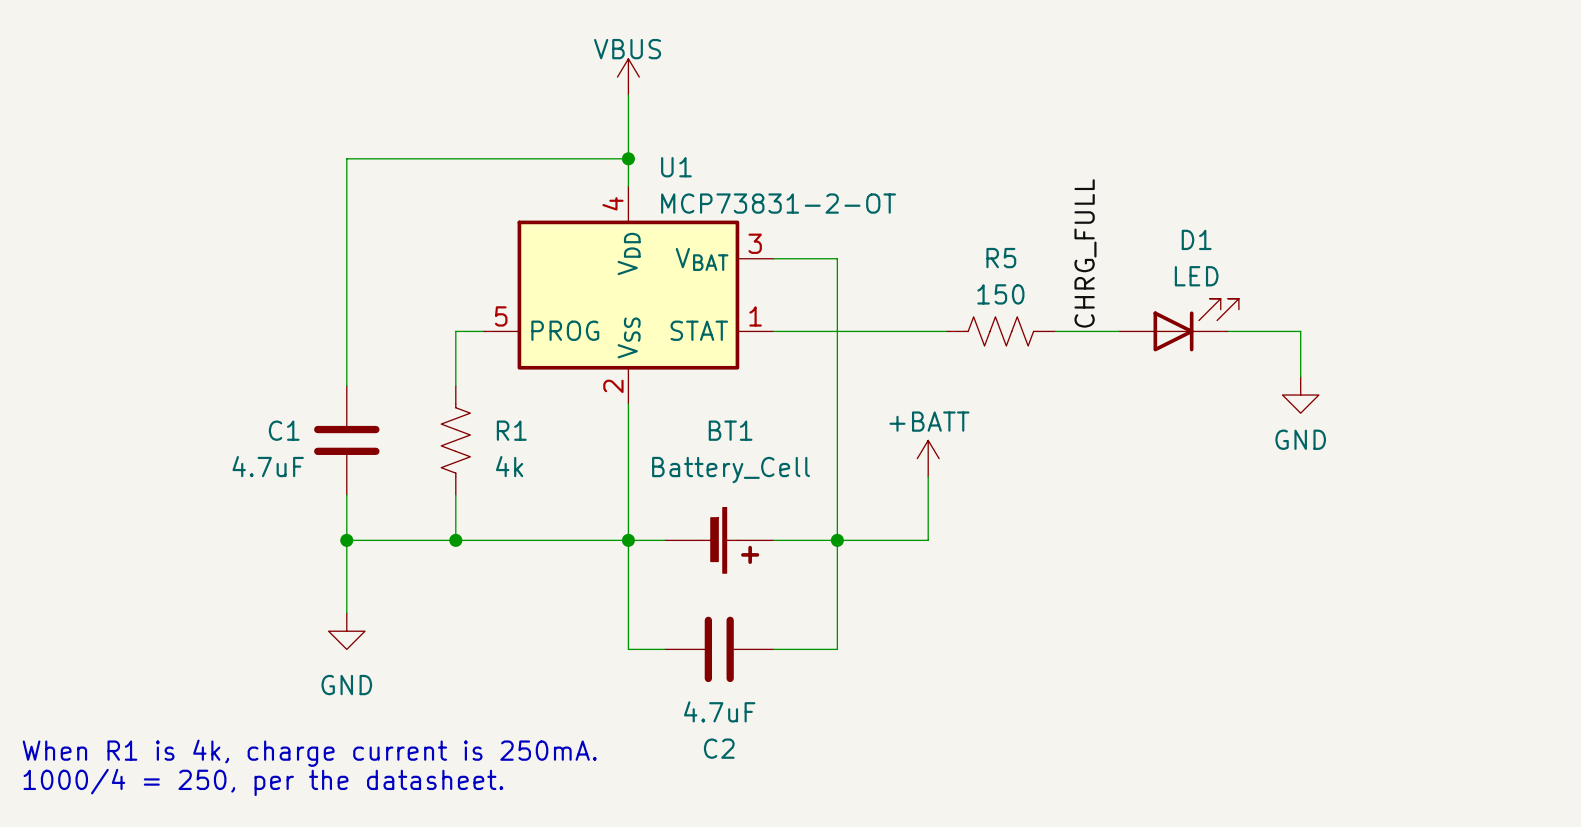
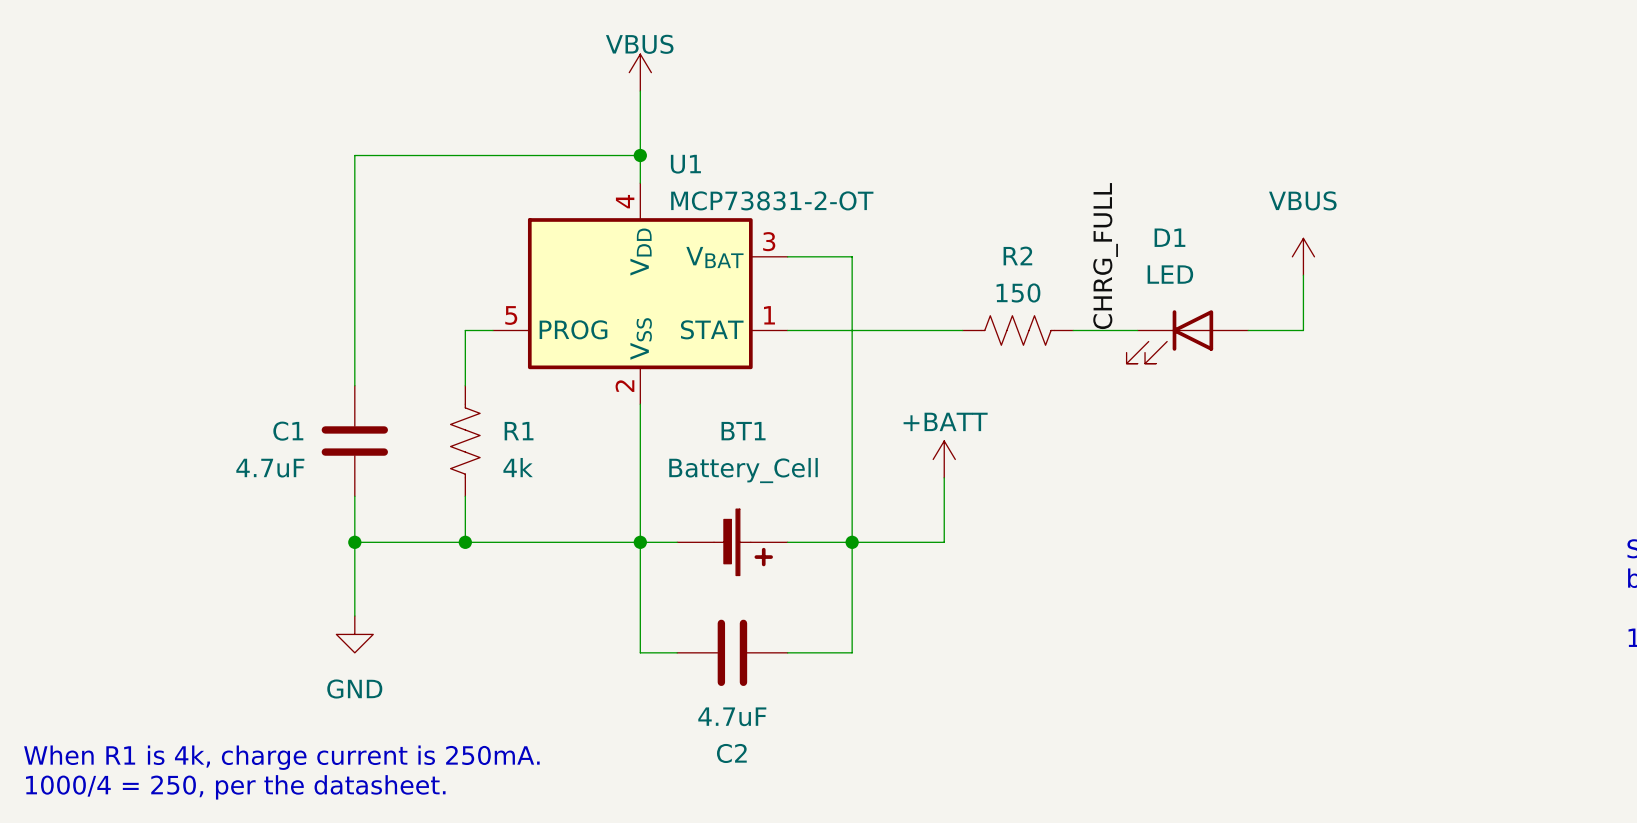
D1 name position: D1 (1196, 239) -> D1 (1169, 237)
R5 name: R5 (1001, 258) -> R2 (1017, 255)
power symbol: none -> VBUS (1303, 256)
D1 value position: LED (1196, 276) -> LED (1170, 274)
D1 rotation: 0° (1196, 325) -> 180° (1169, 336)
wire: (1282, 331) (1300, 331) (1300, 376) -> (1303, 330) (1303, 275)
power symbol: GND (1300, 395) -> none

